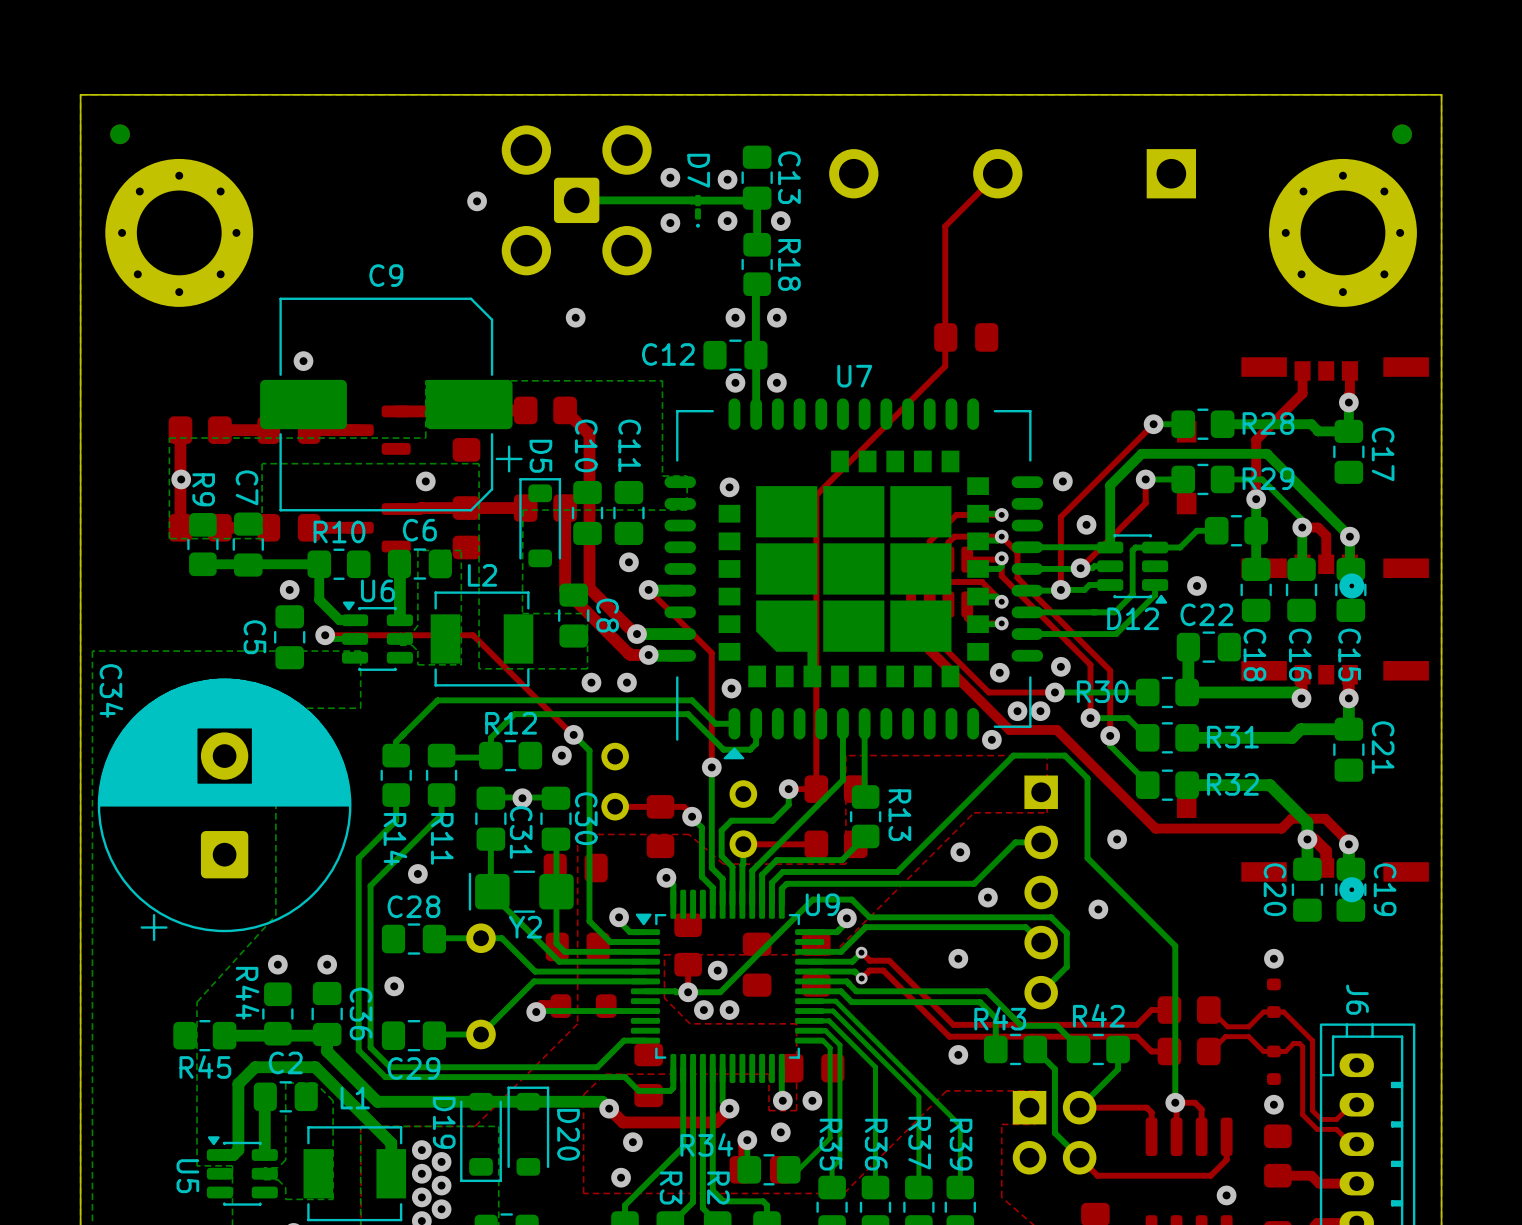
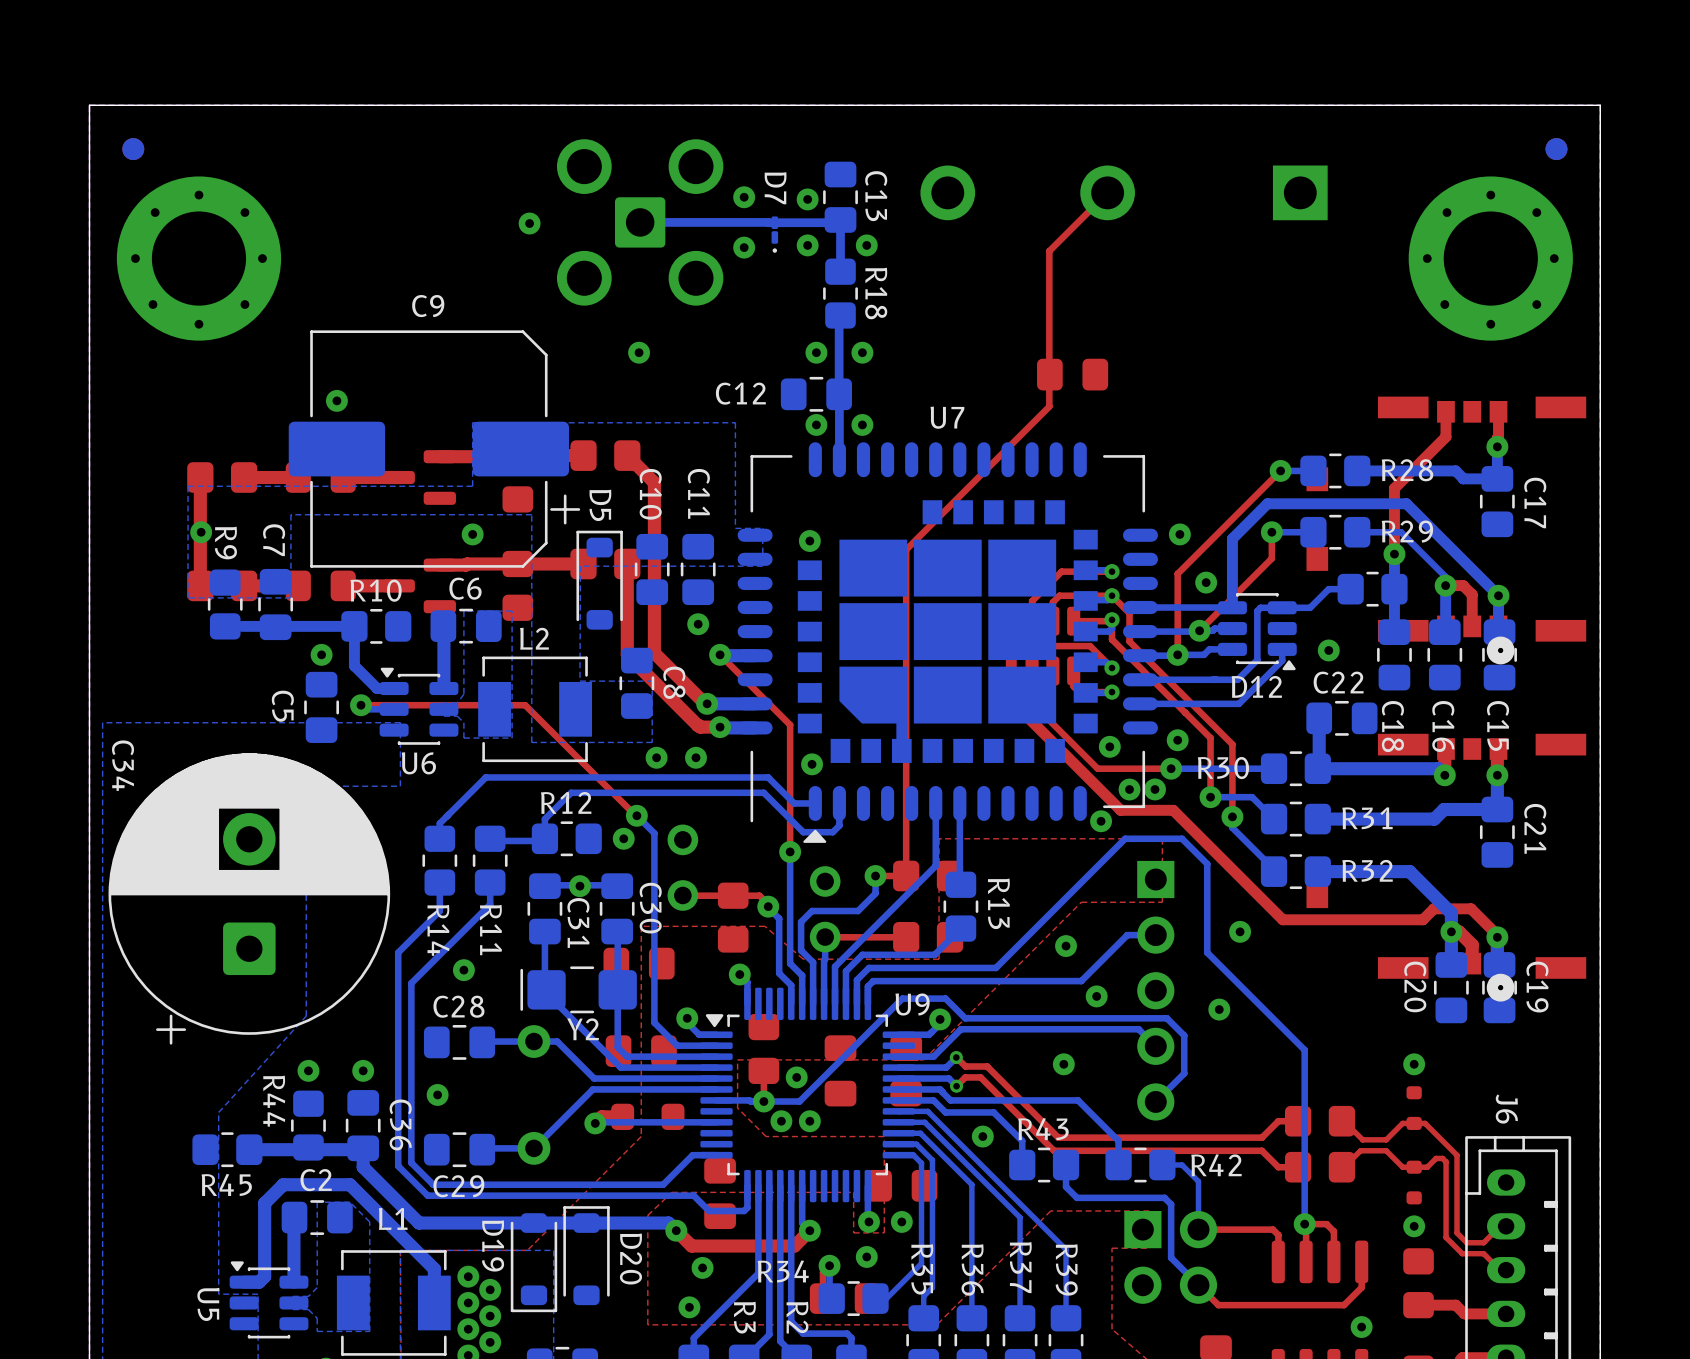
U6 name position: U6 (377, 590) -> U6 (418, 763)
bottom track: (971, 991) (986, 991) (1021, 1025) (1056, 1025) (1078, 1049) -> (1078, 1100) (1118, 1140) (1118, 1165)
bottom track: (895, 1002) (980, 1002) (995, 1017) (995, 1049) -> (993, 1112) (1022, 1140) (1022, 1165)
R42 name position: R42 (1098, 1015) -> R42 (1216, 1165)
R43 name position: R43 (1000, 1018) -> R43 (1043, 1129)
R43 position: (1015, 1049) -> (1044, 1165)
bottom track: (1035, 1049) (1054, 1069) (1054, 1084) -> (1066, 1165) (1066, 1186) (1076, 1197) (1164, 1197) (1171, 1204)
R42 position: (1098, 1049) -> (1140, 1165)
via position: (958, 1054) -> (982, 1136)
bottom track: (1118, 1055) (1118, 1069) (1079, 1107) -> (1162, 1165) (1182, 1165) (1198, 1181) (1198, 1229)

